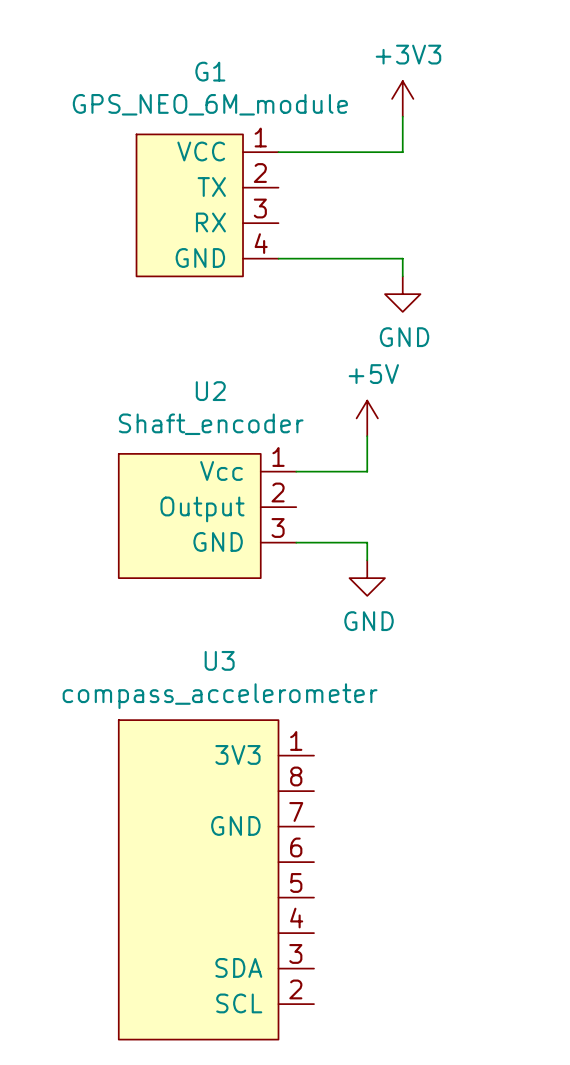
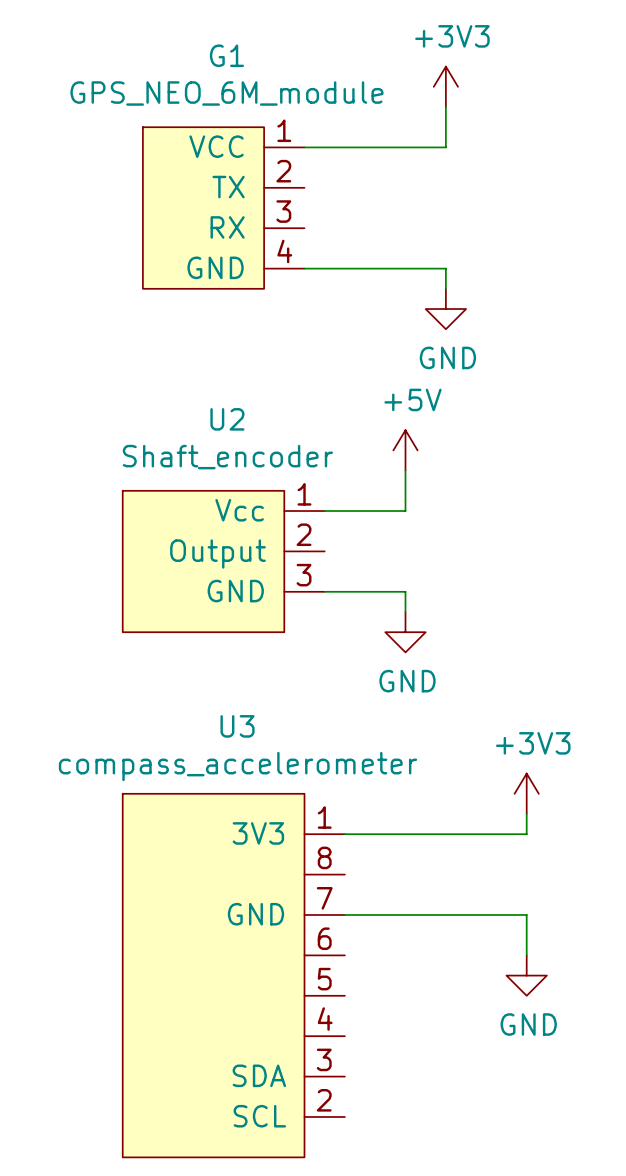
power symbol: none -> +3V3 (526, 793)
wire: none -> (526, 813) (526, 834) (344, 834)
wire: none -> (344, 914) (526, 914) (526, 955)
power symbol: none -> GND (526, 975)

